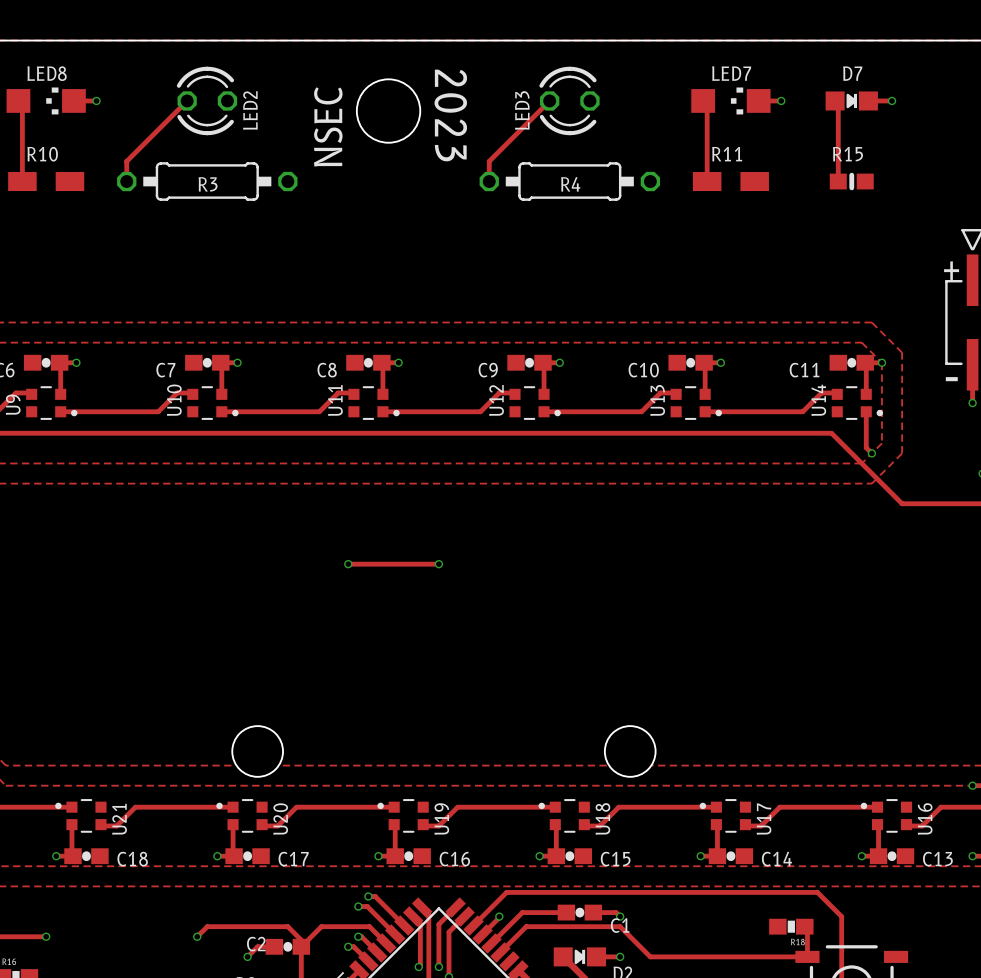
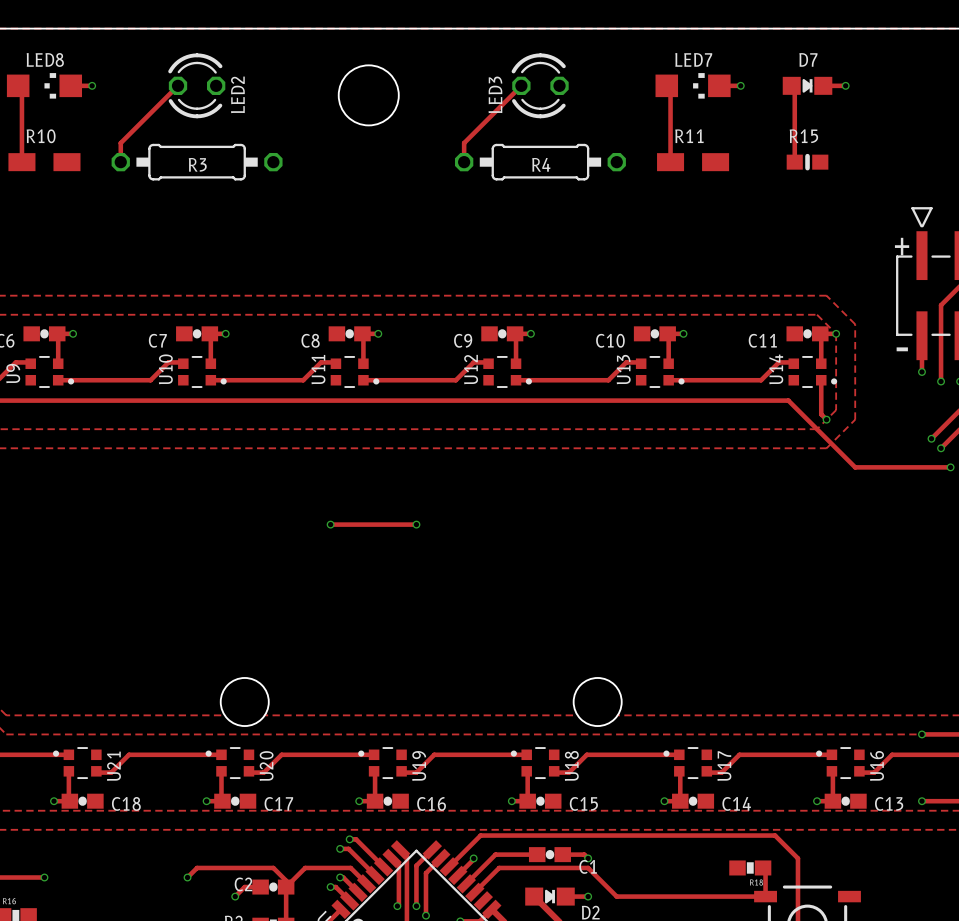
text: 2023 (450, 115) -> none
text: NSEC (328, 126) -> none

